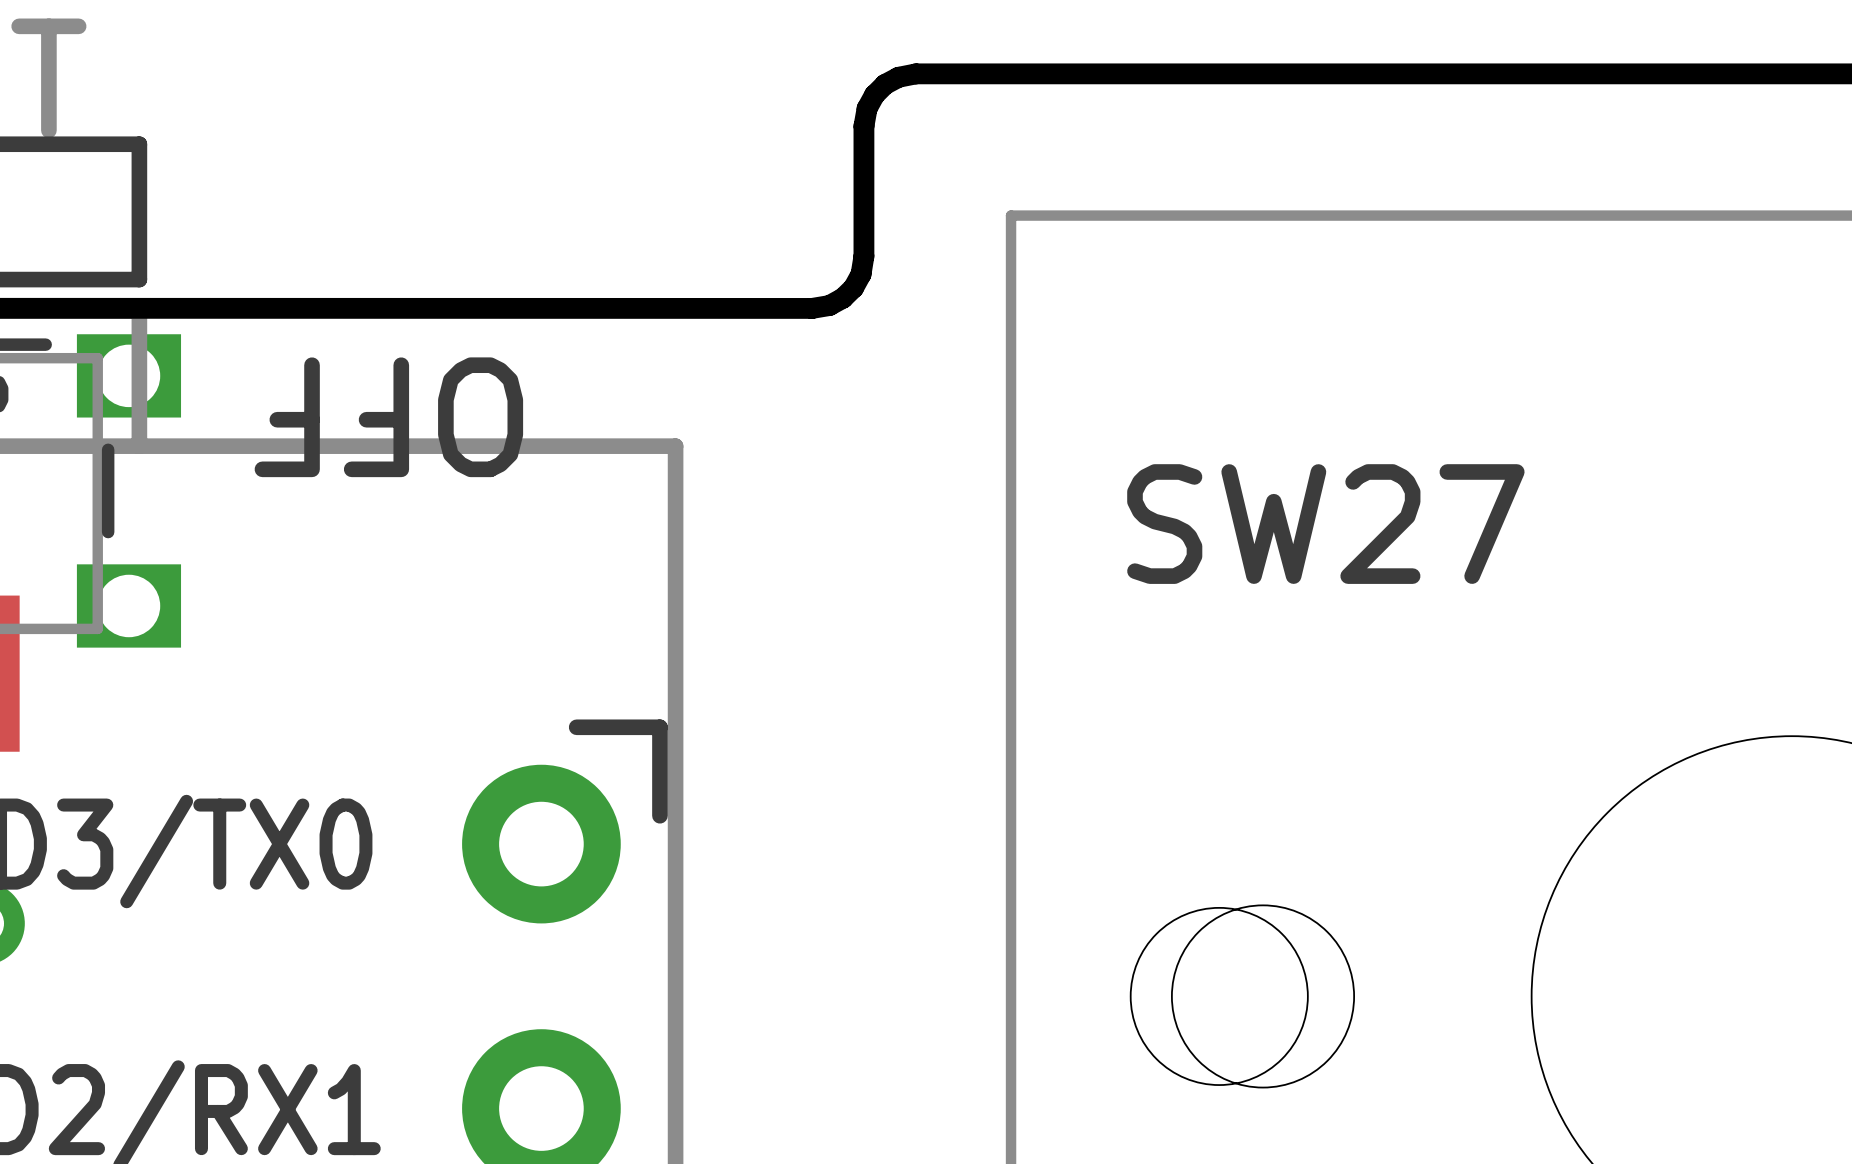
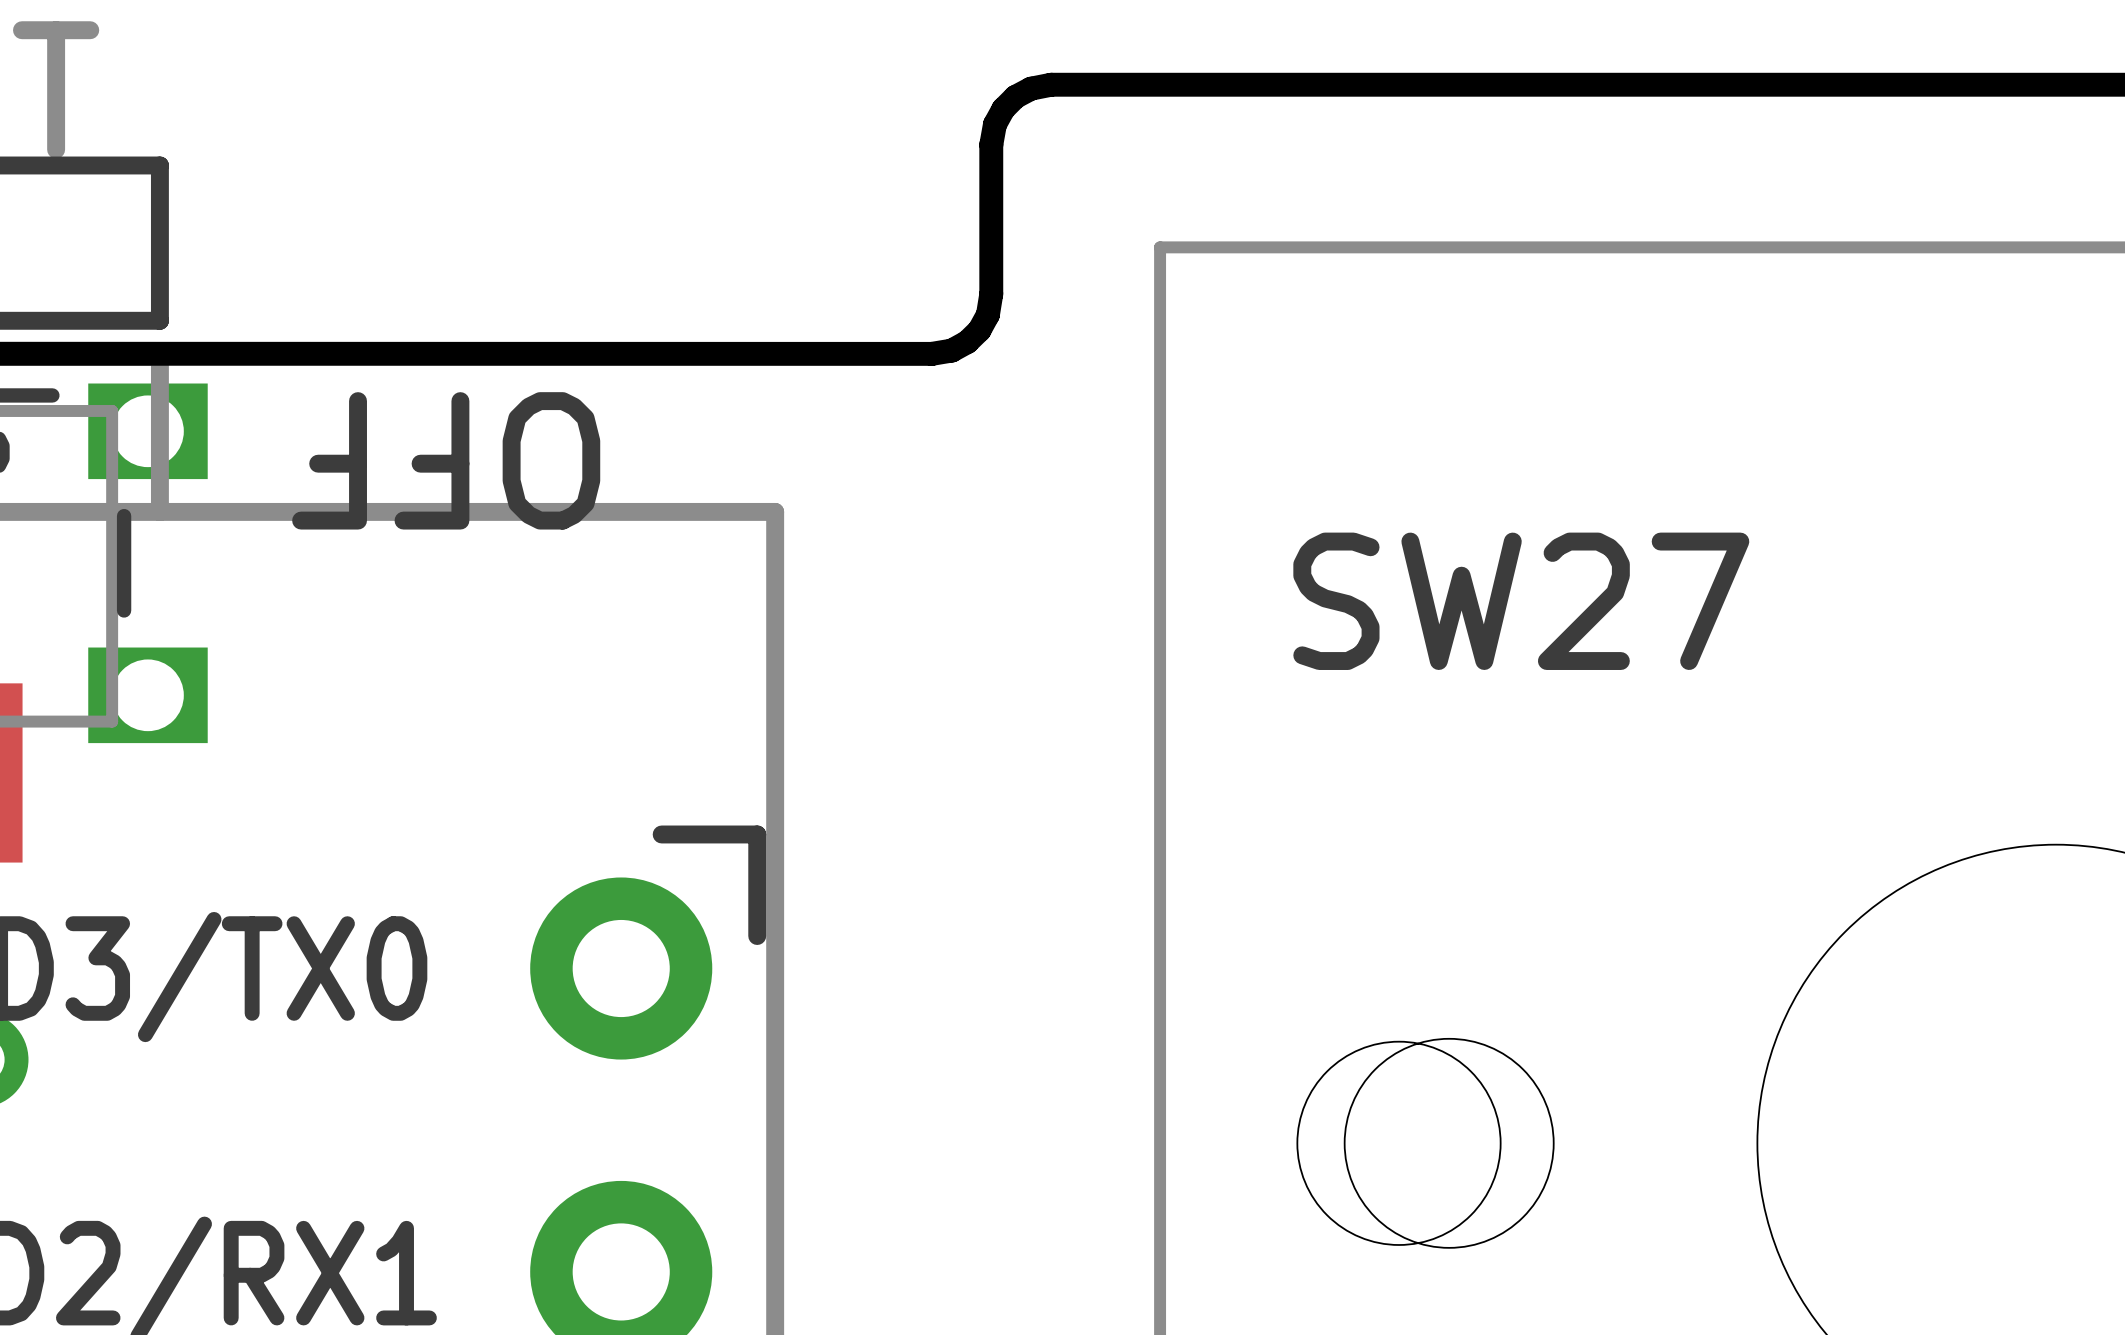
text position: OFF (388, 417) -> OFF (446, 460)

